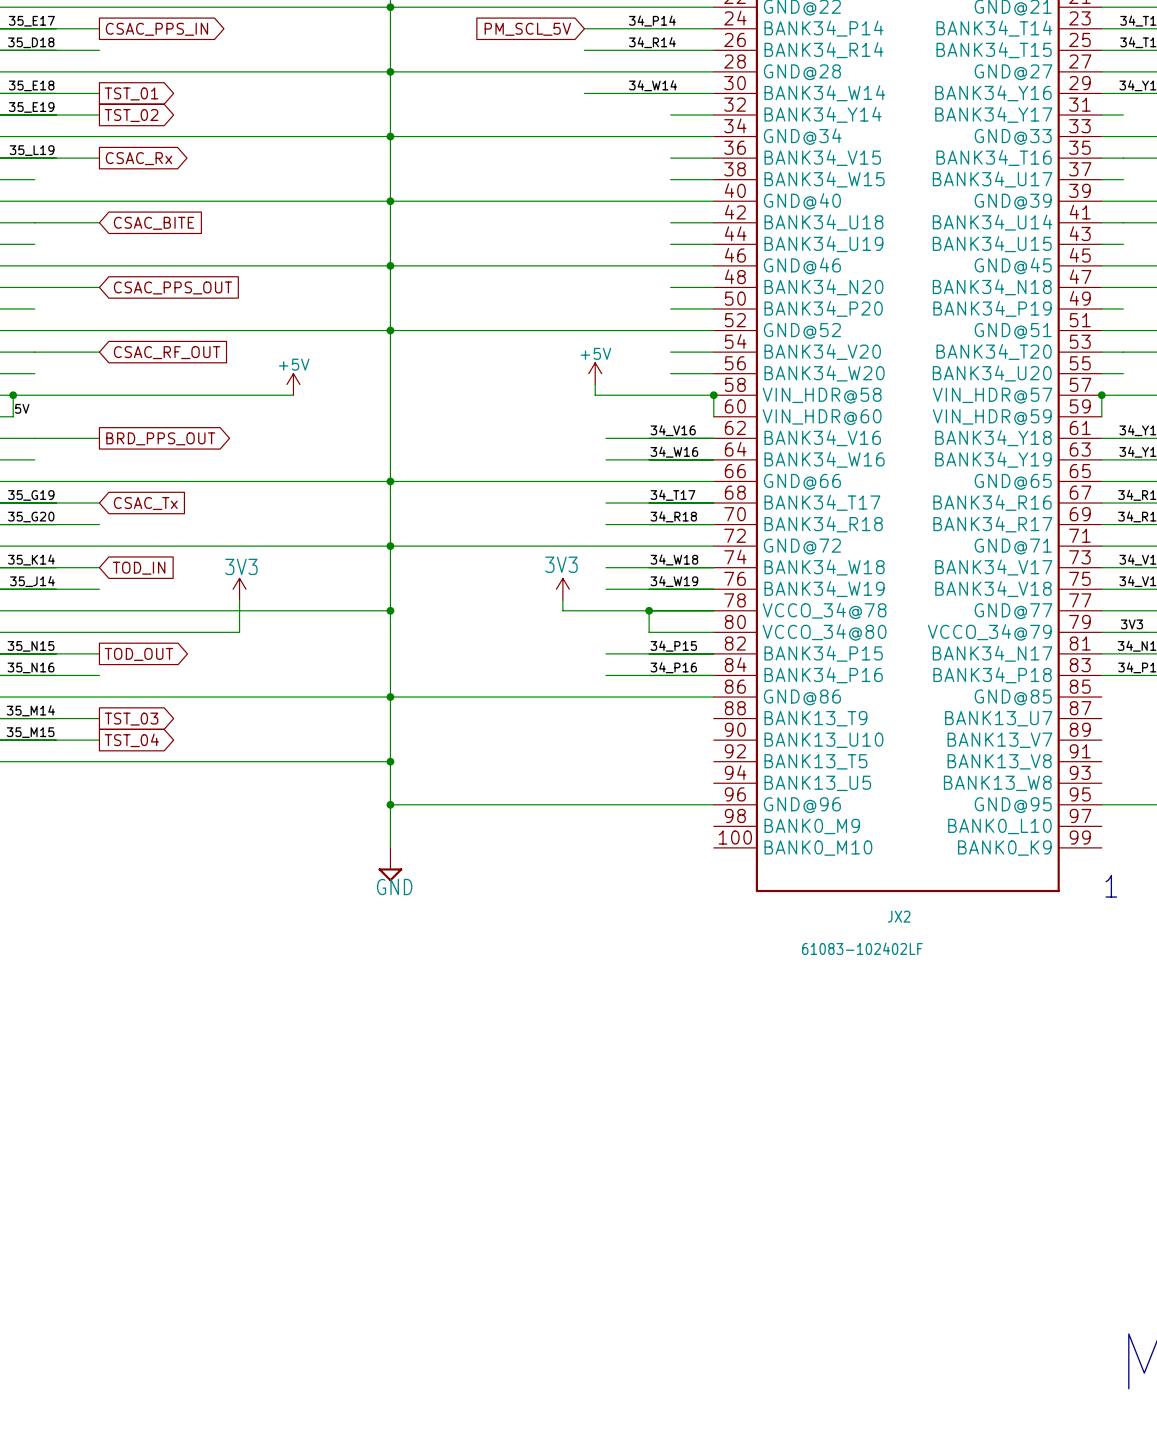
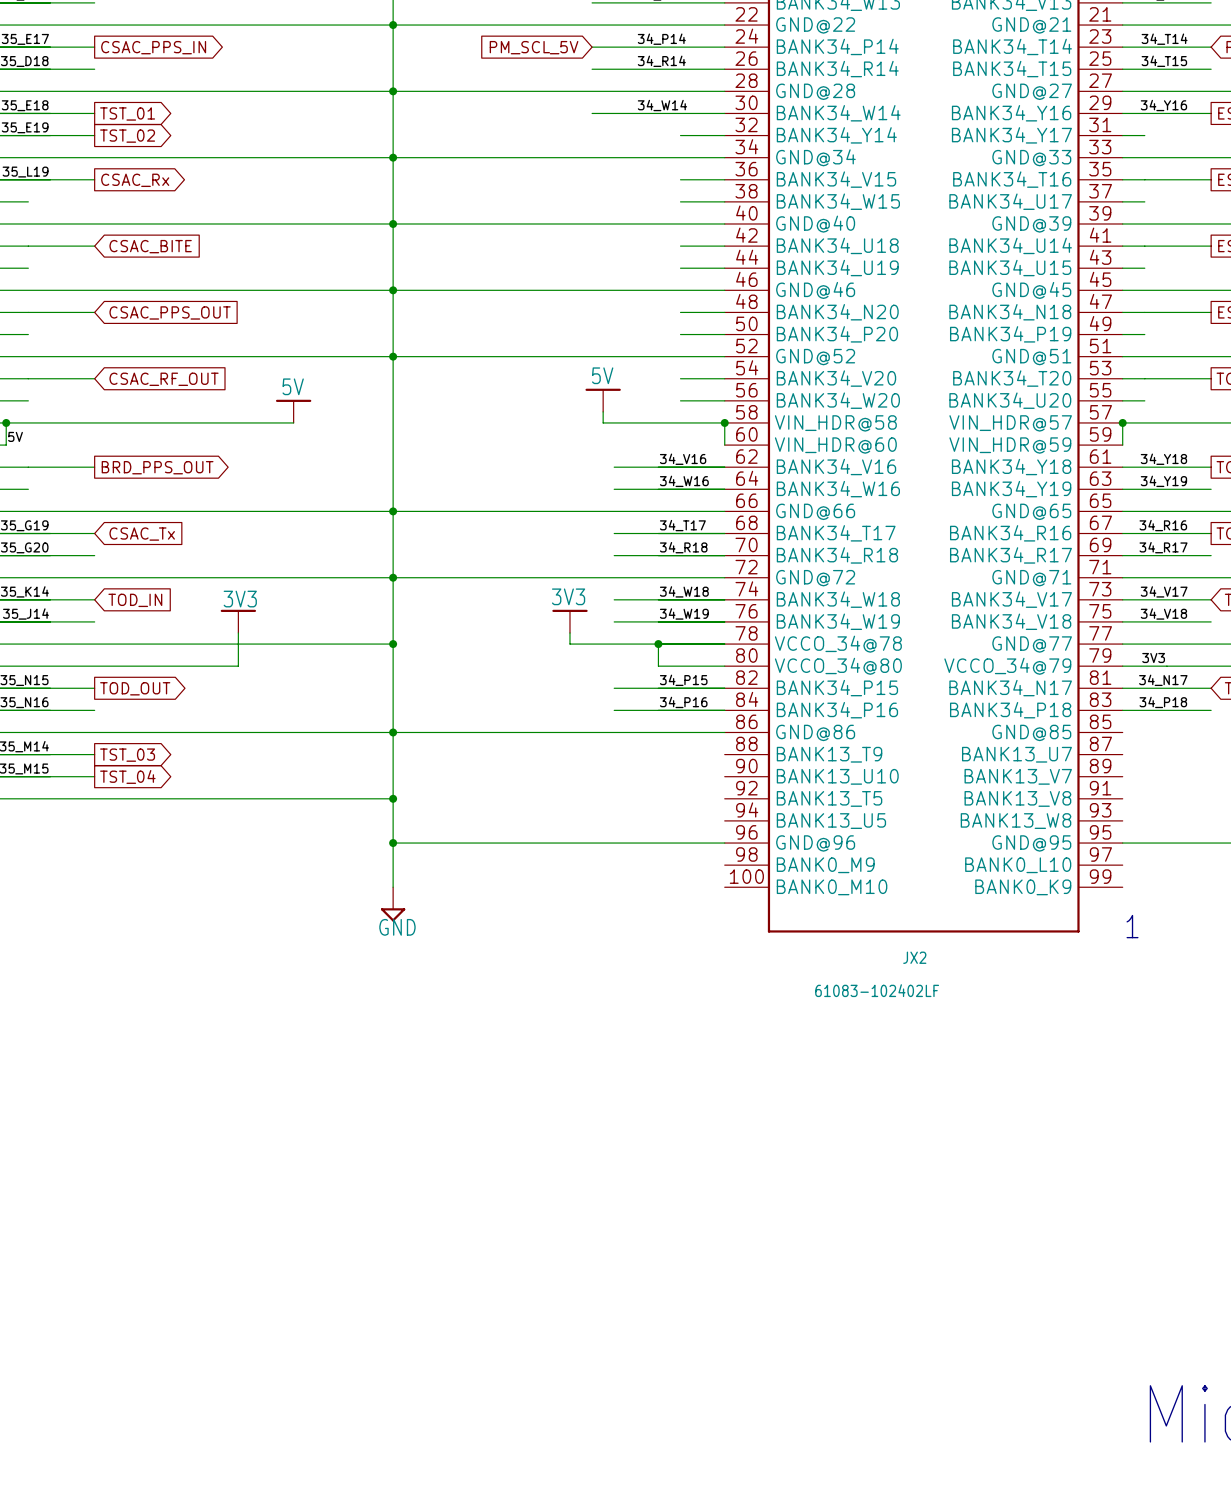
power symbol: +5V (595, 373) -> 5V (603, 400)
power symbol: +5V (293, 384) -> 5V (293, 411)
power symbol shape: [233, 578, 247, 601] -> [220, 609, 257, 633]
power symbol shape: [556, 578, 570, 601] -> [552, 609, 588, 633]

